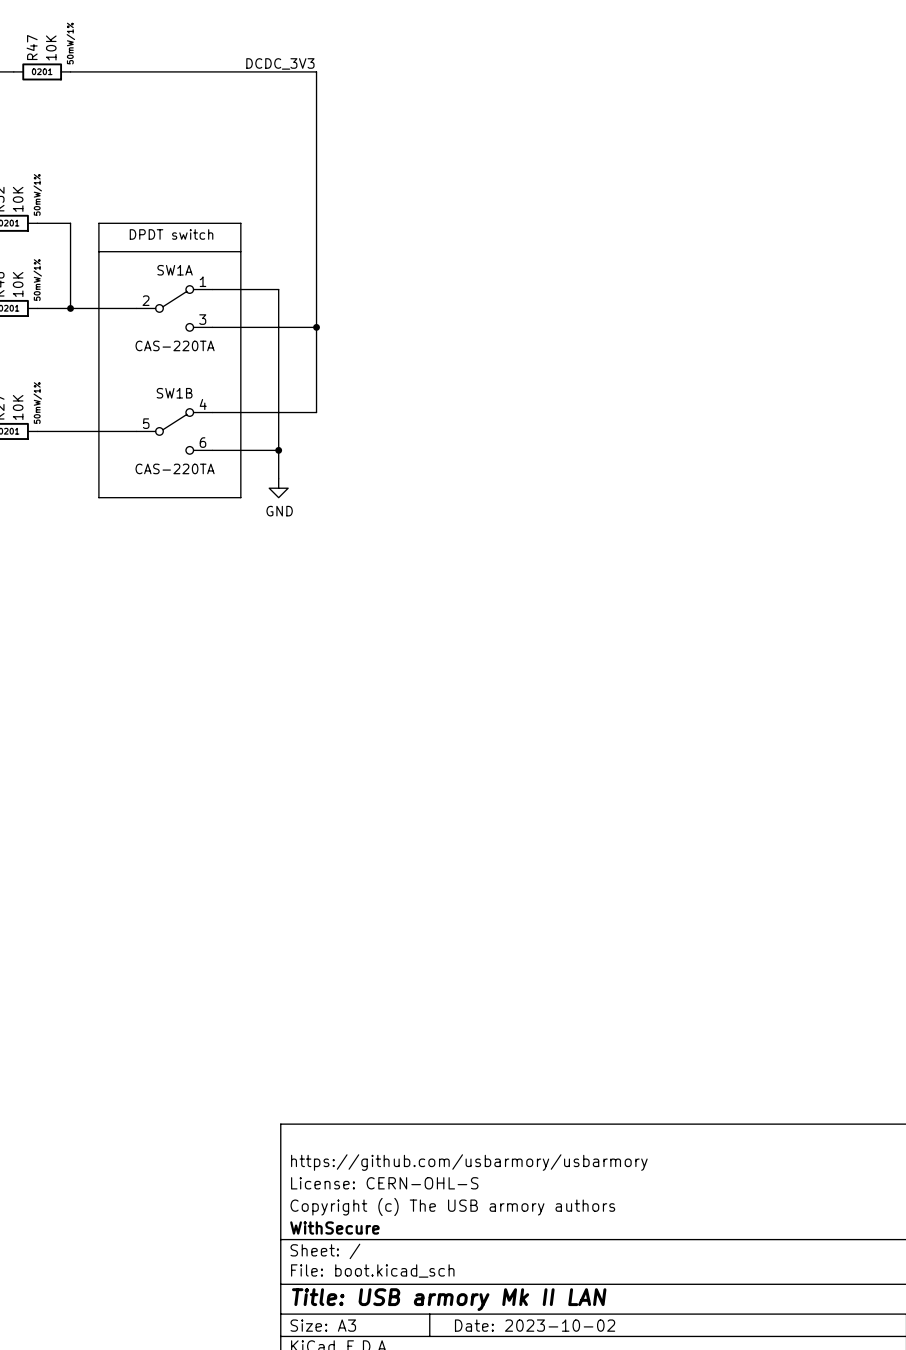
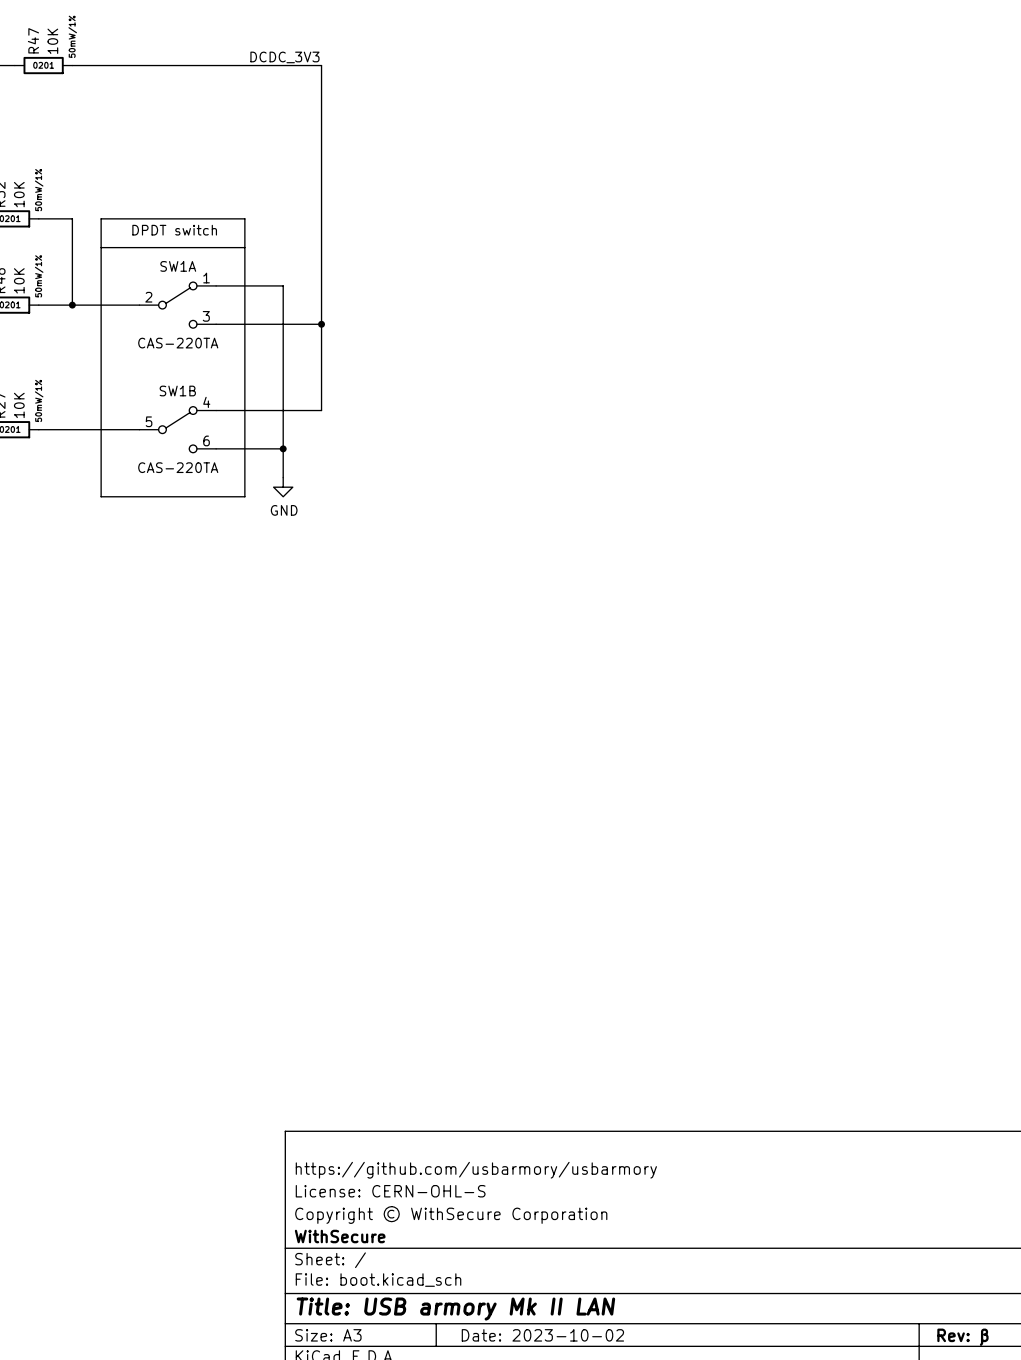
title block: Copyright (c) The USB armory authors (452, 1206) -> Copyright © WithSecure Corporation (451, 1214)

